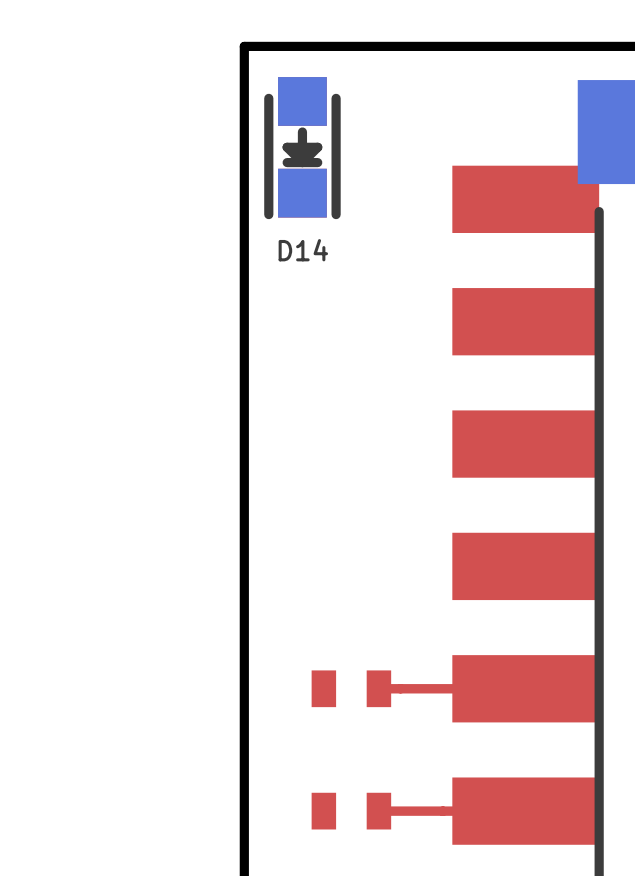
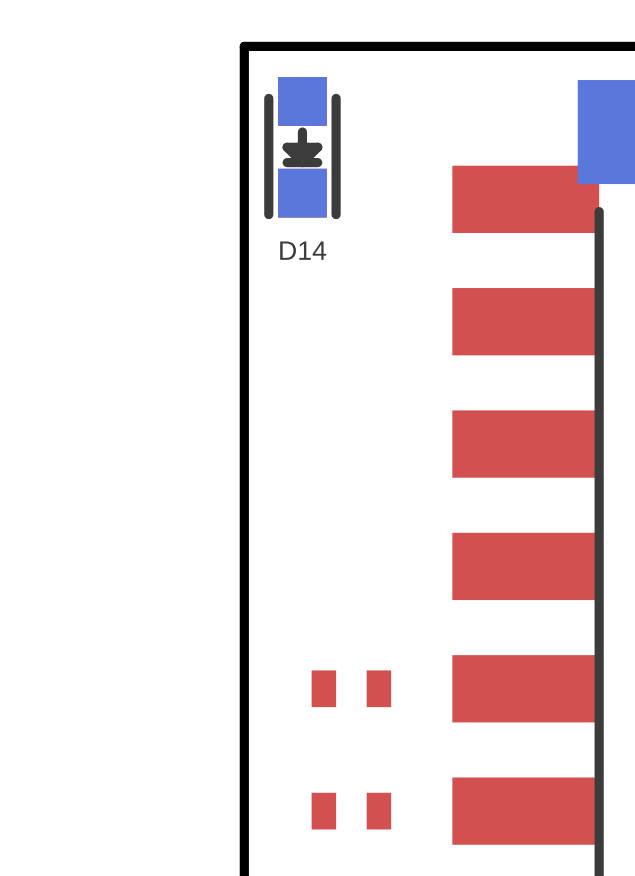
top track: (525, 688) (378, 688) -> none
top track: (525, 811) (378, 811) -> none

